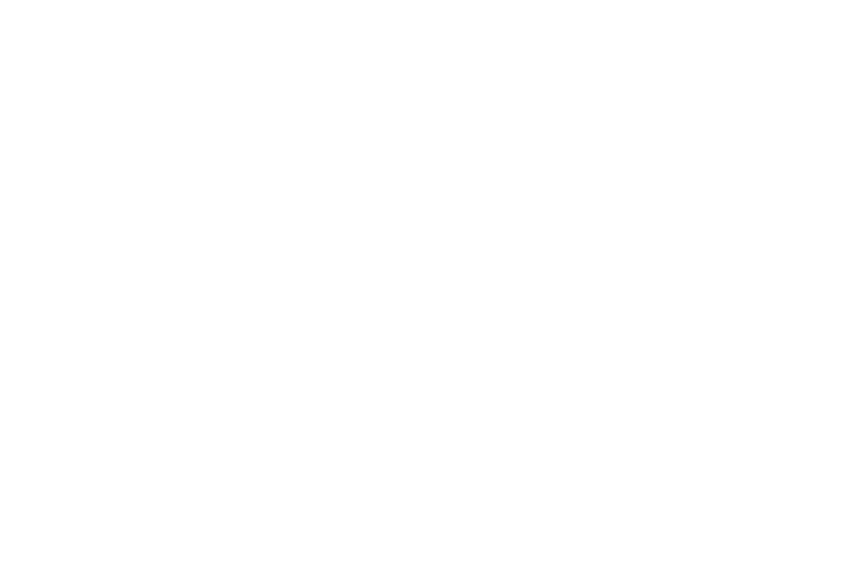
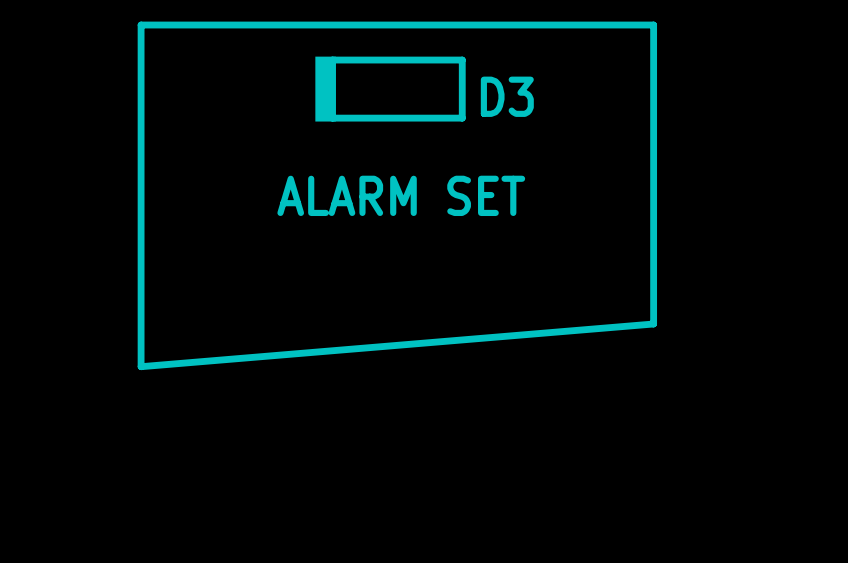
line: none -> (141, 25) (141, 366) (653, 323) (653, 25) (141, 25)
drawing: none -> [315, 56, 336, 122]
line: none -> (332, 60) (332, 118) (462, 118) (462, 60) (332, 60)
text: none -> D3 (507, 96)
text: none -> ALARM SET (401, 195)

